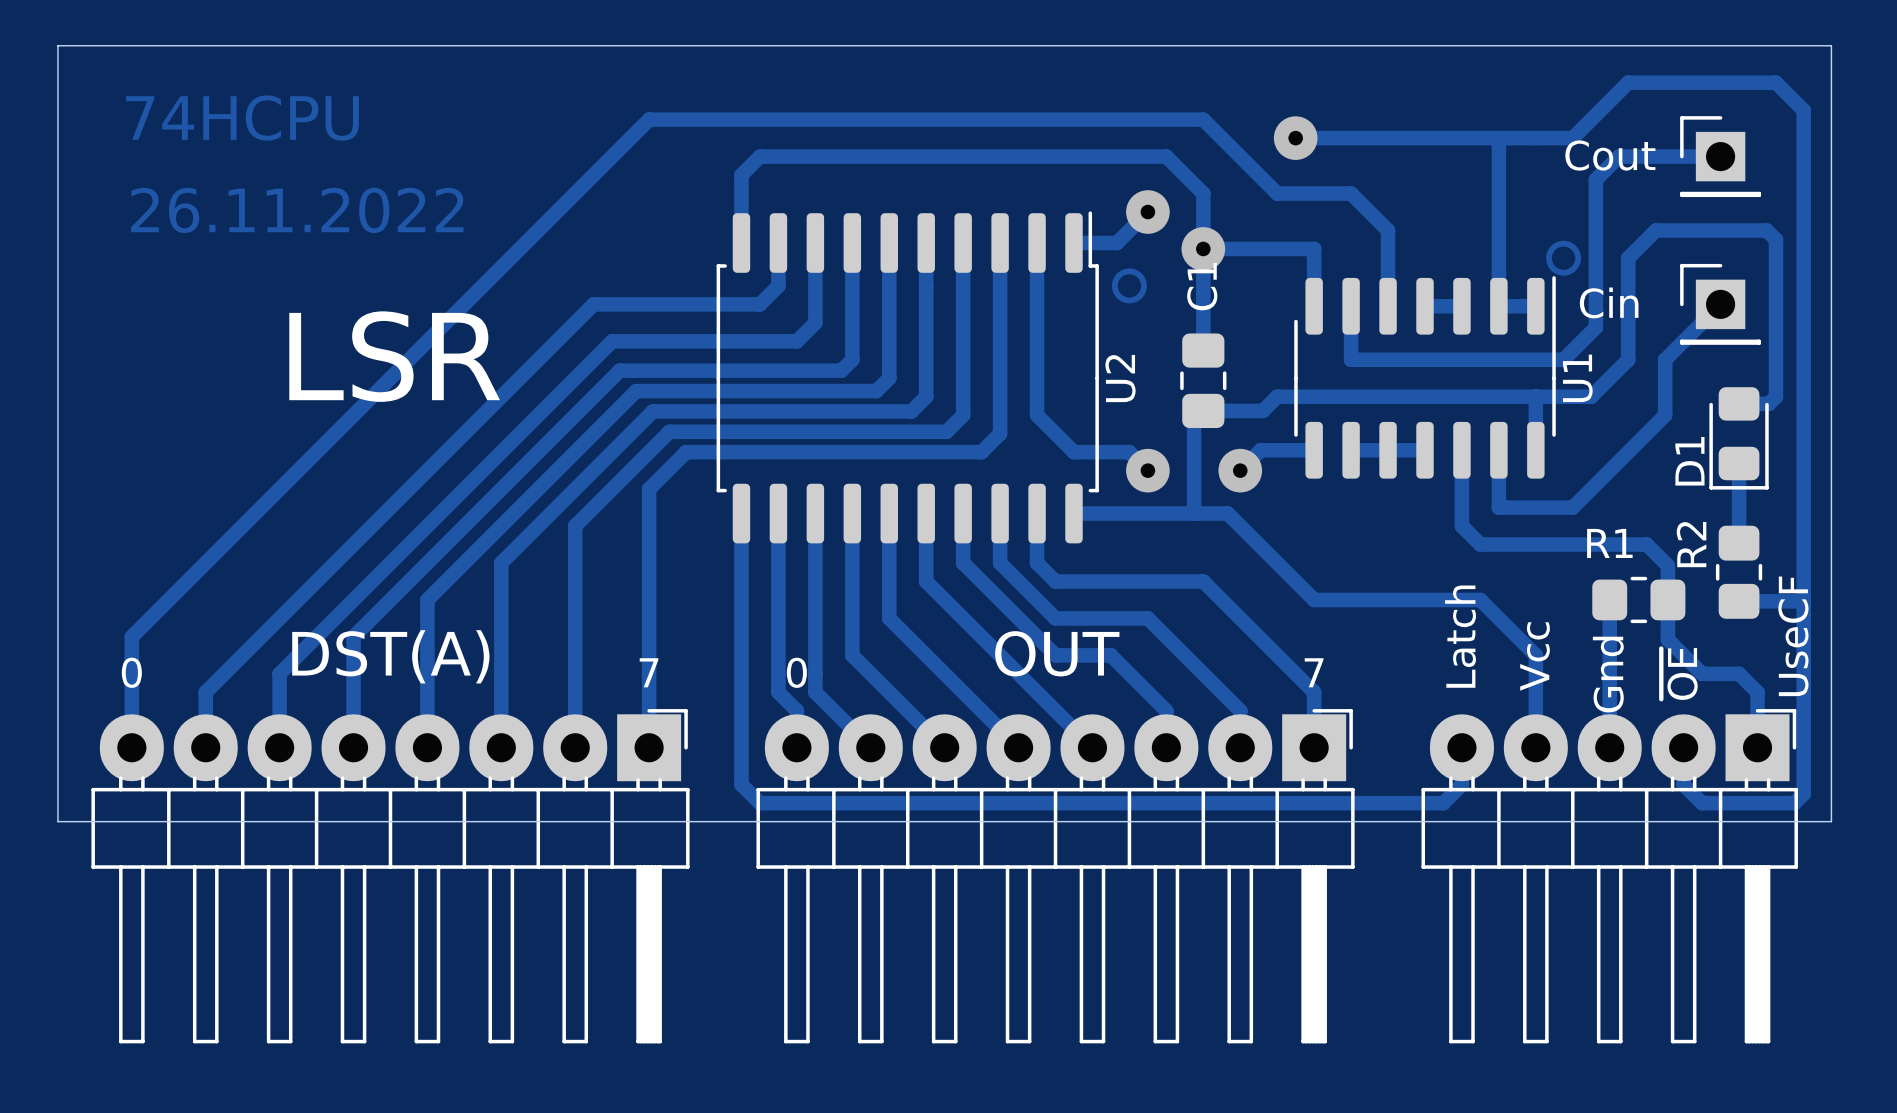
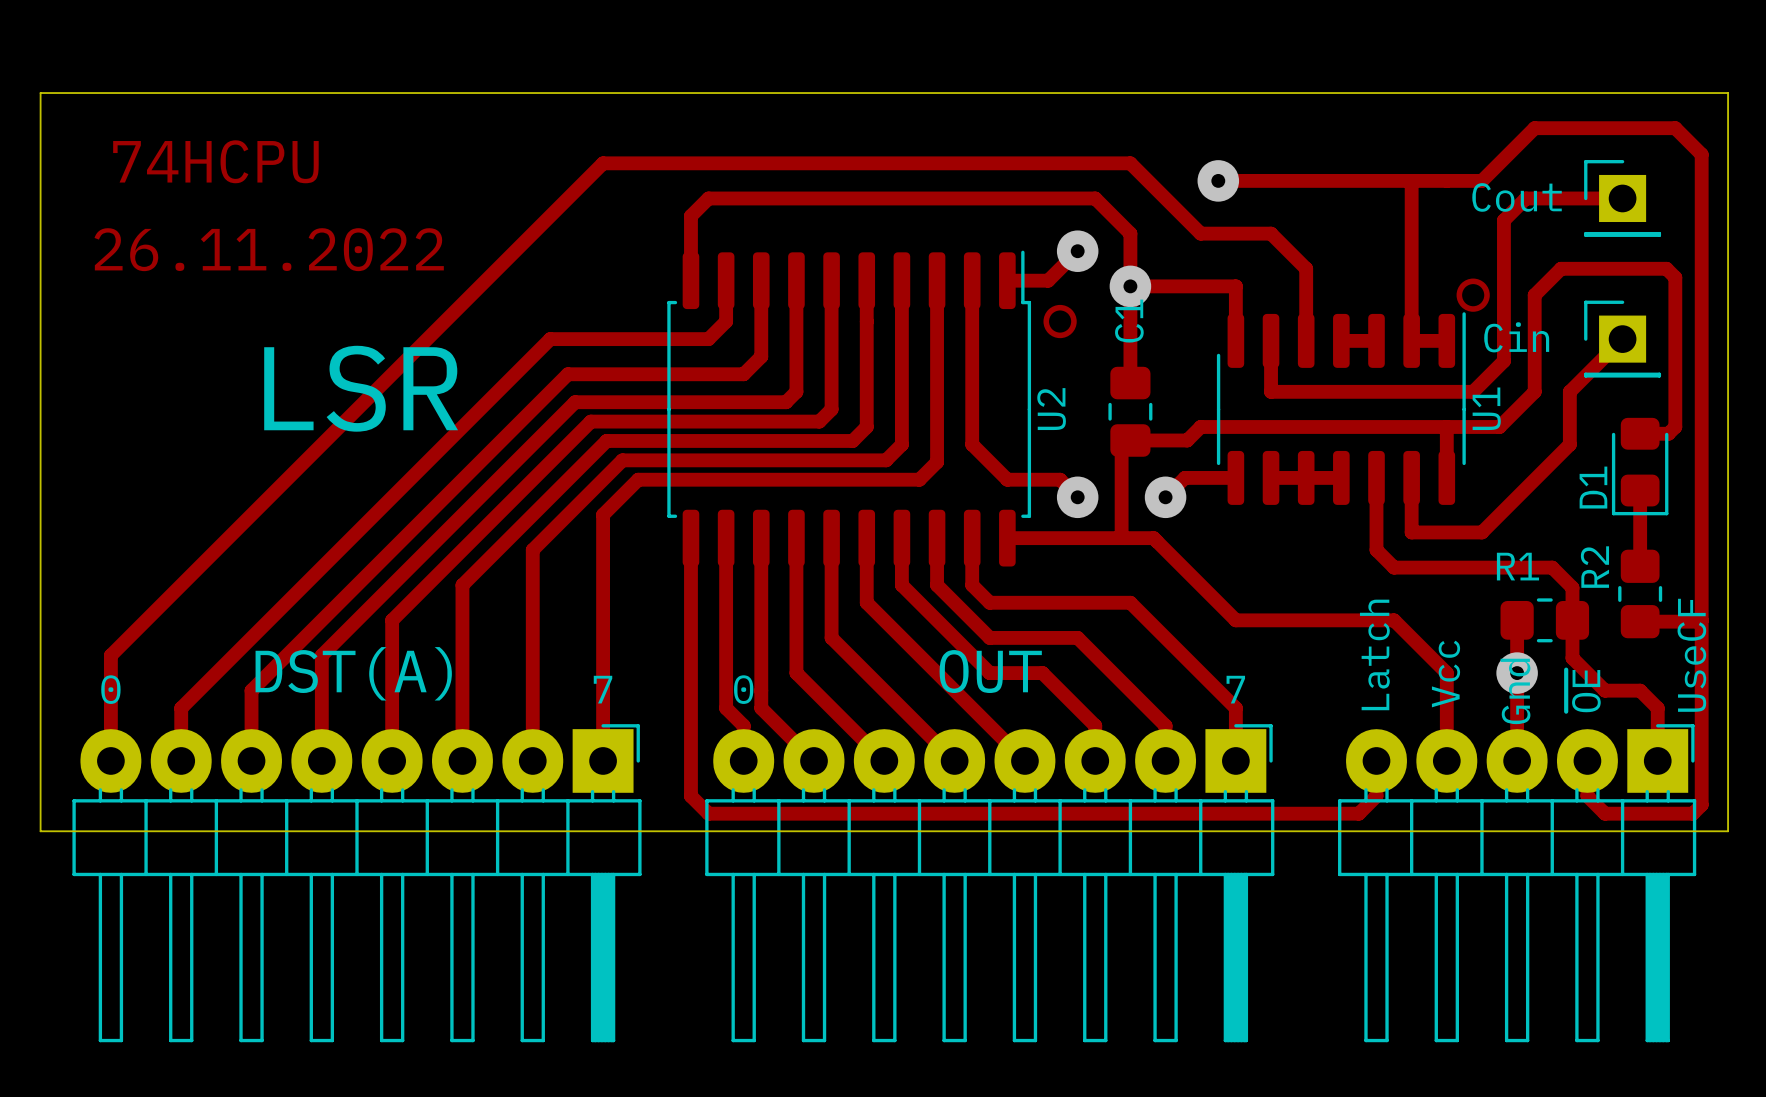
via: none -> (1517, 673)

